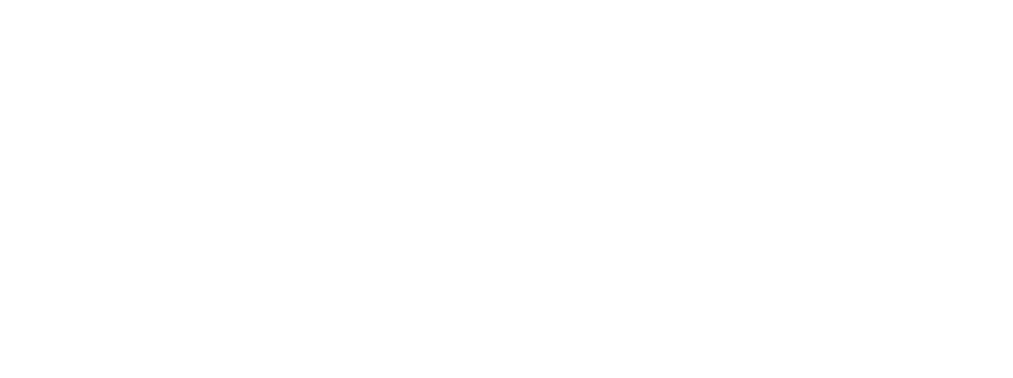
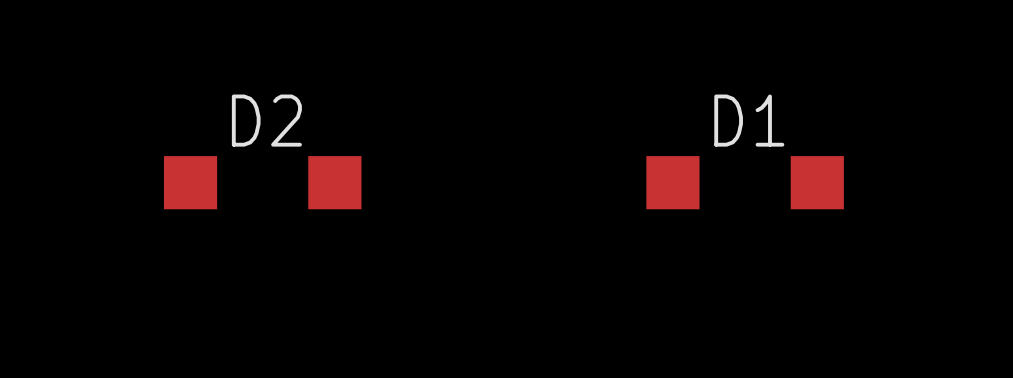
D2: none -> (262, 182)
D1: none -> (745, 182)

